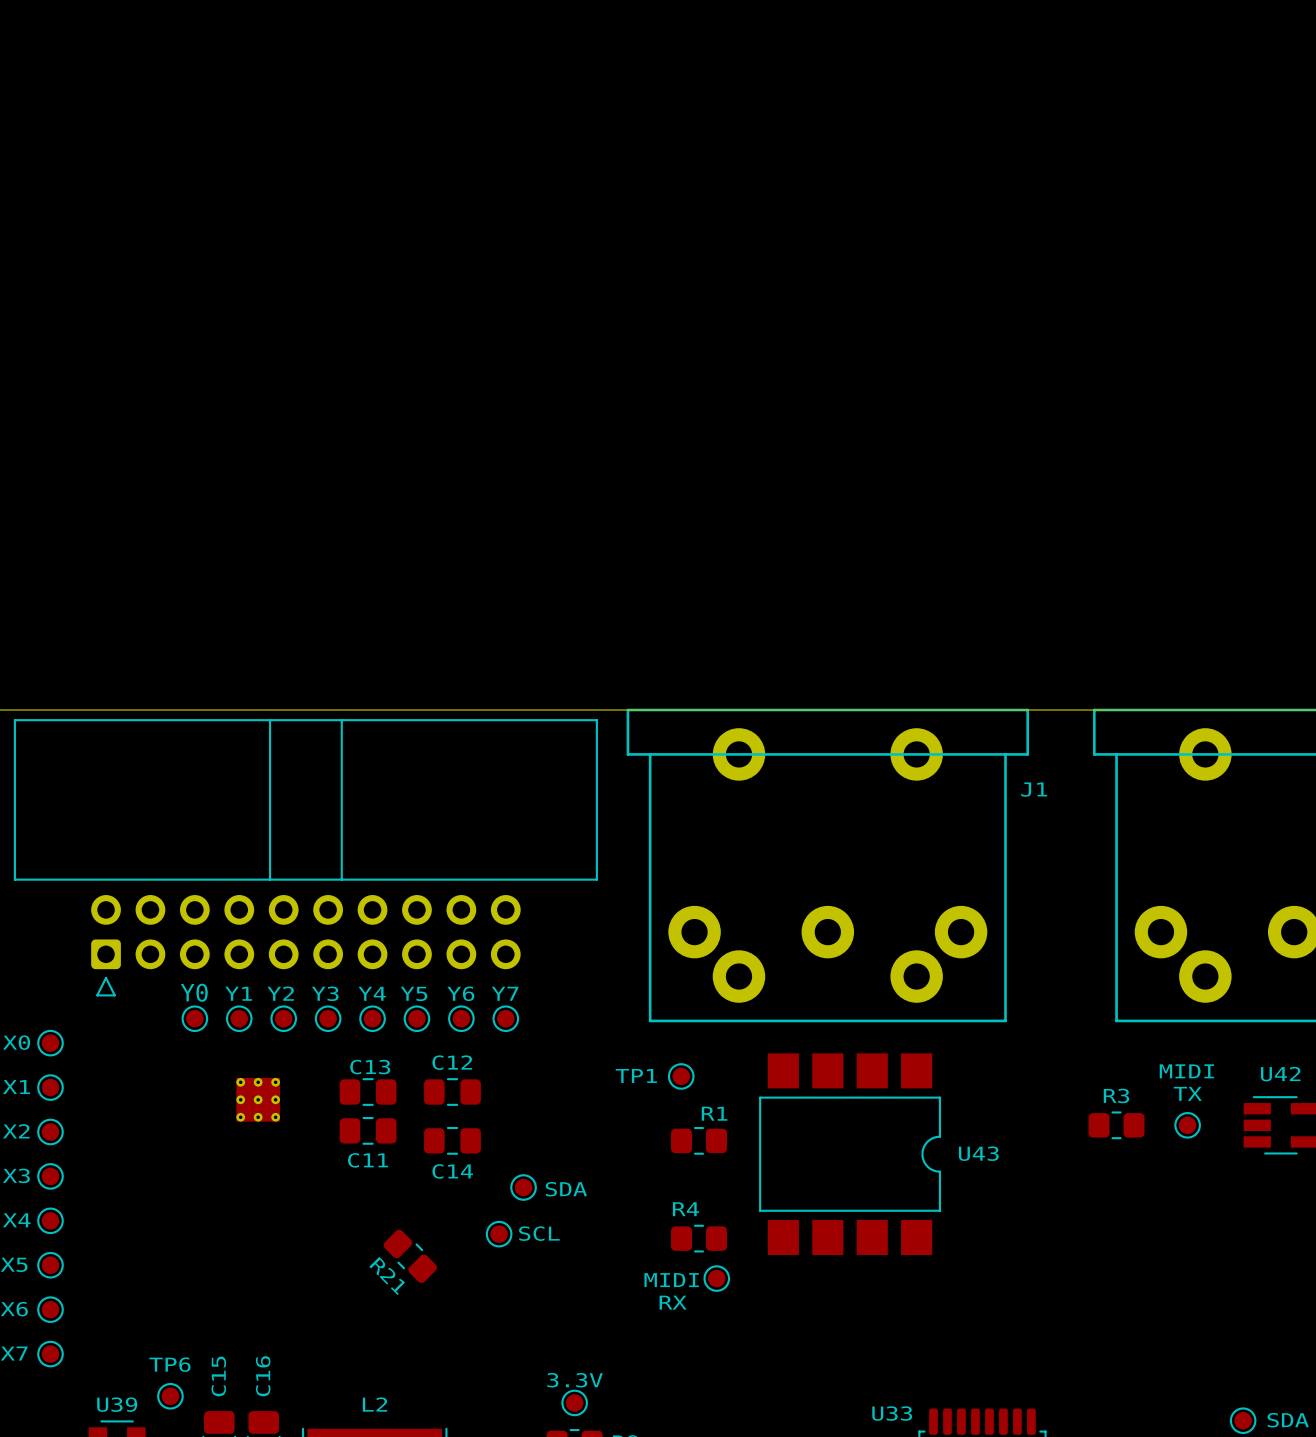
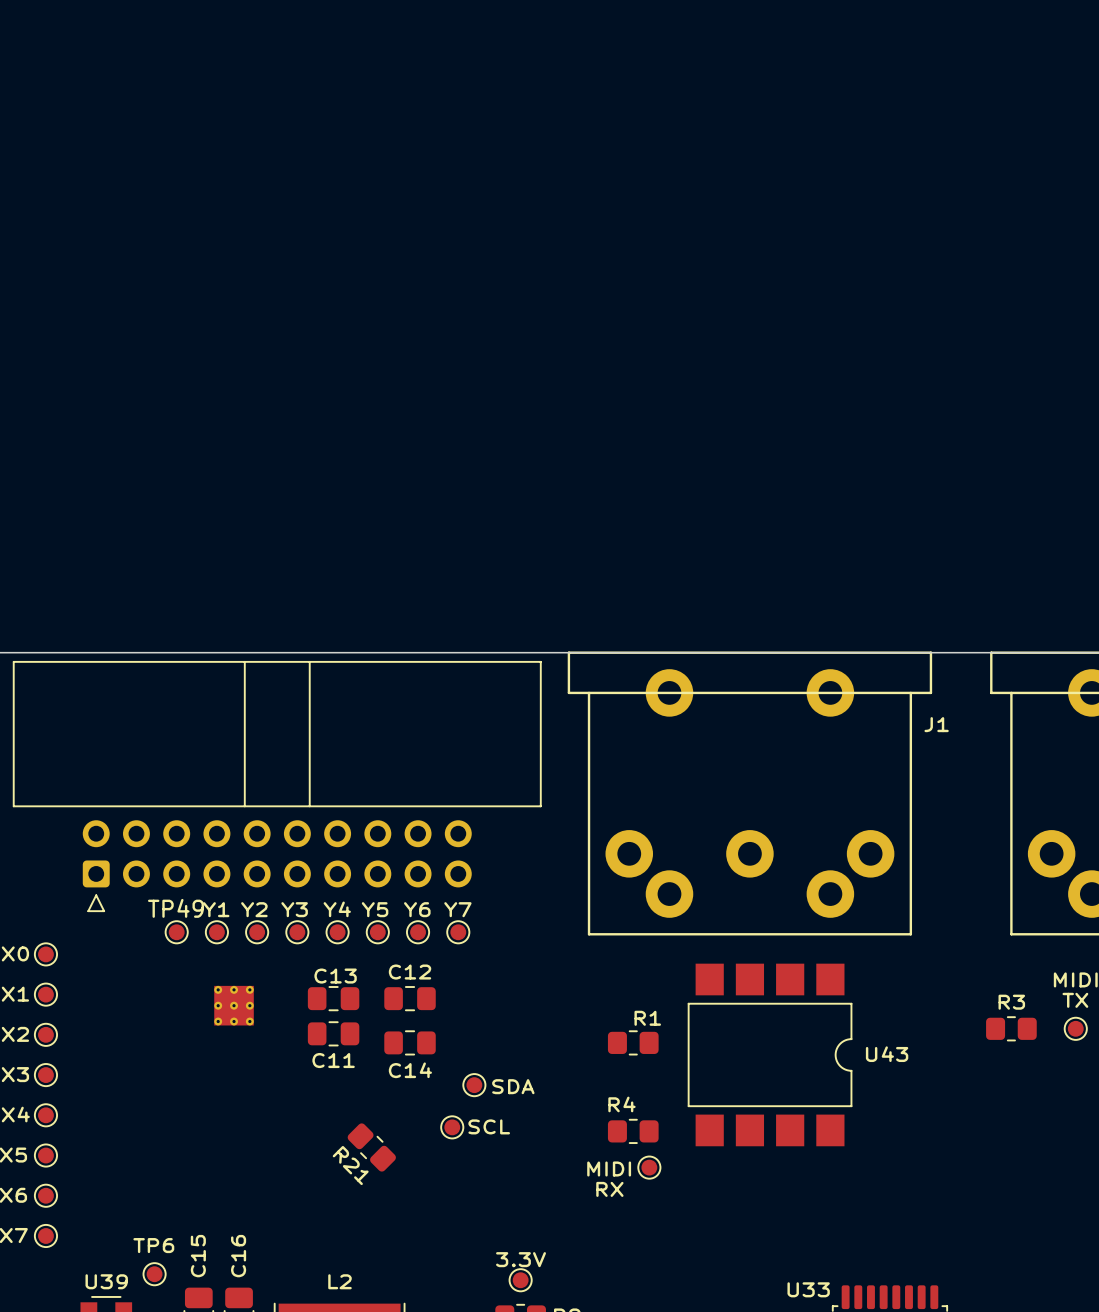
Y0 name: Y0 (194, 992) -> TP49 (175, 908)
TP1: (681, 1076) -> none

